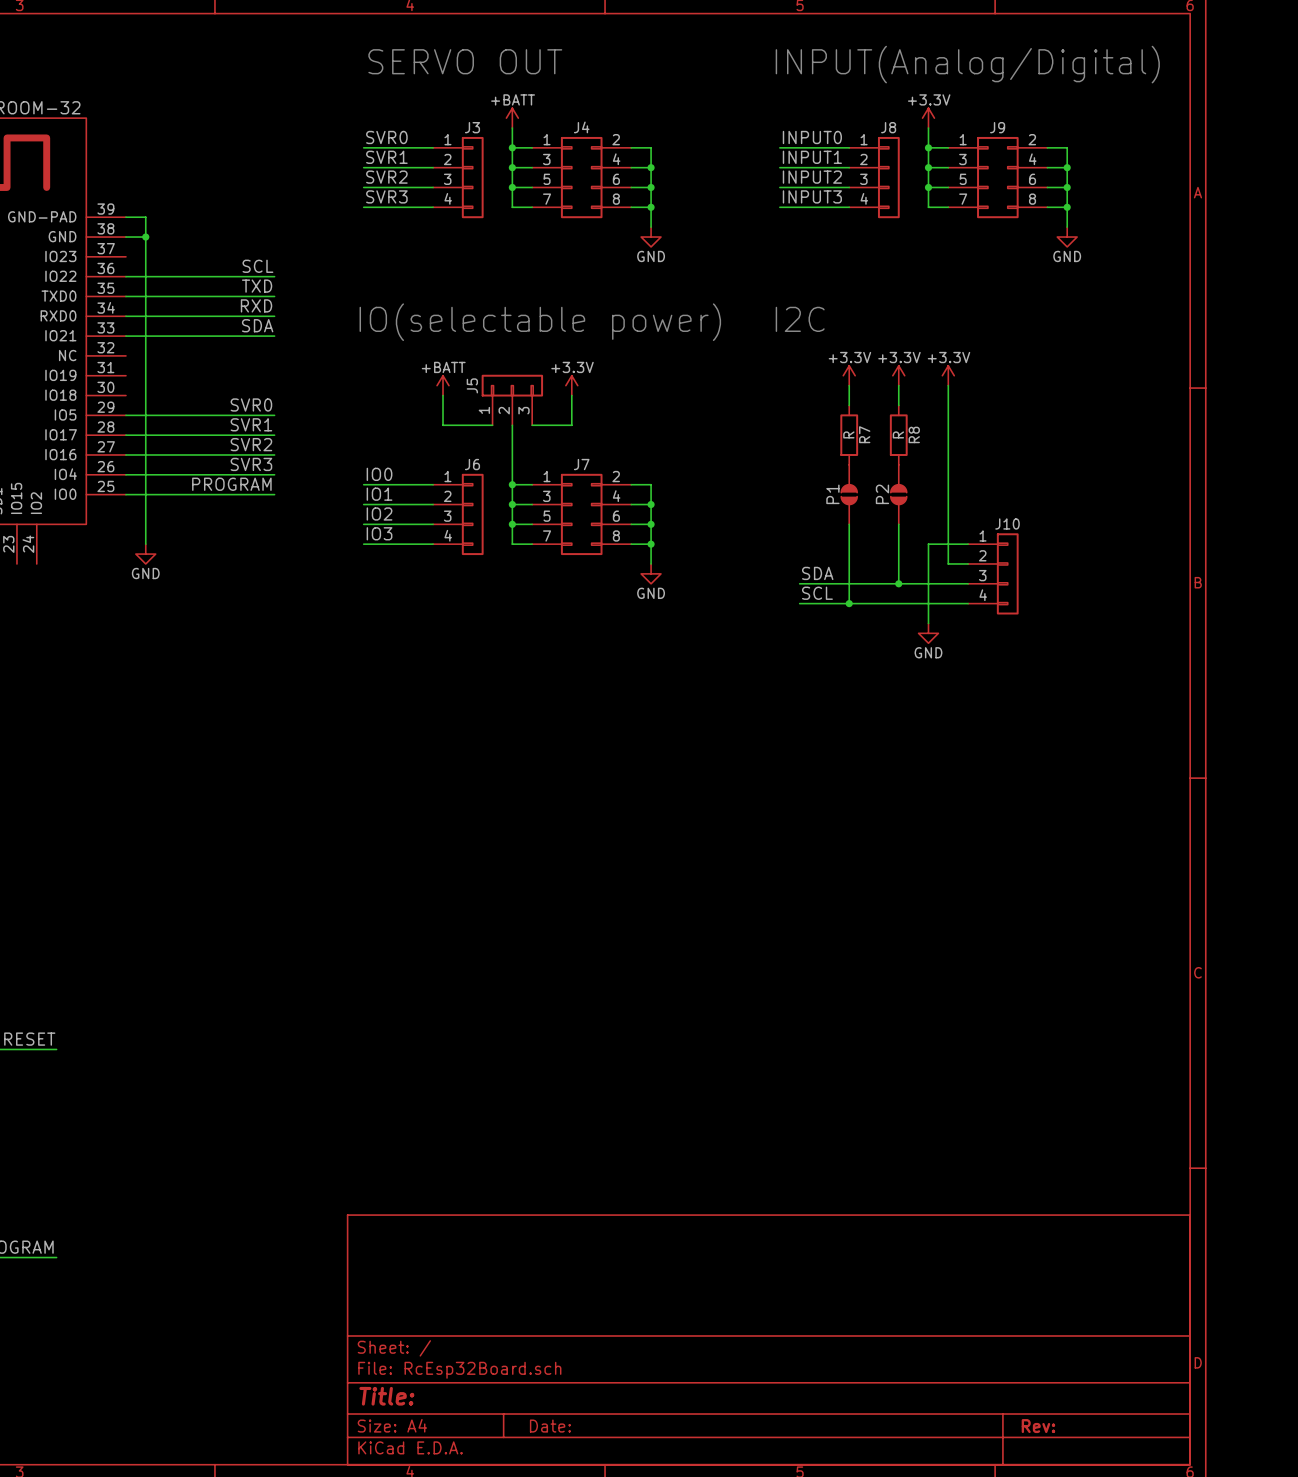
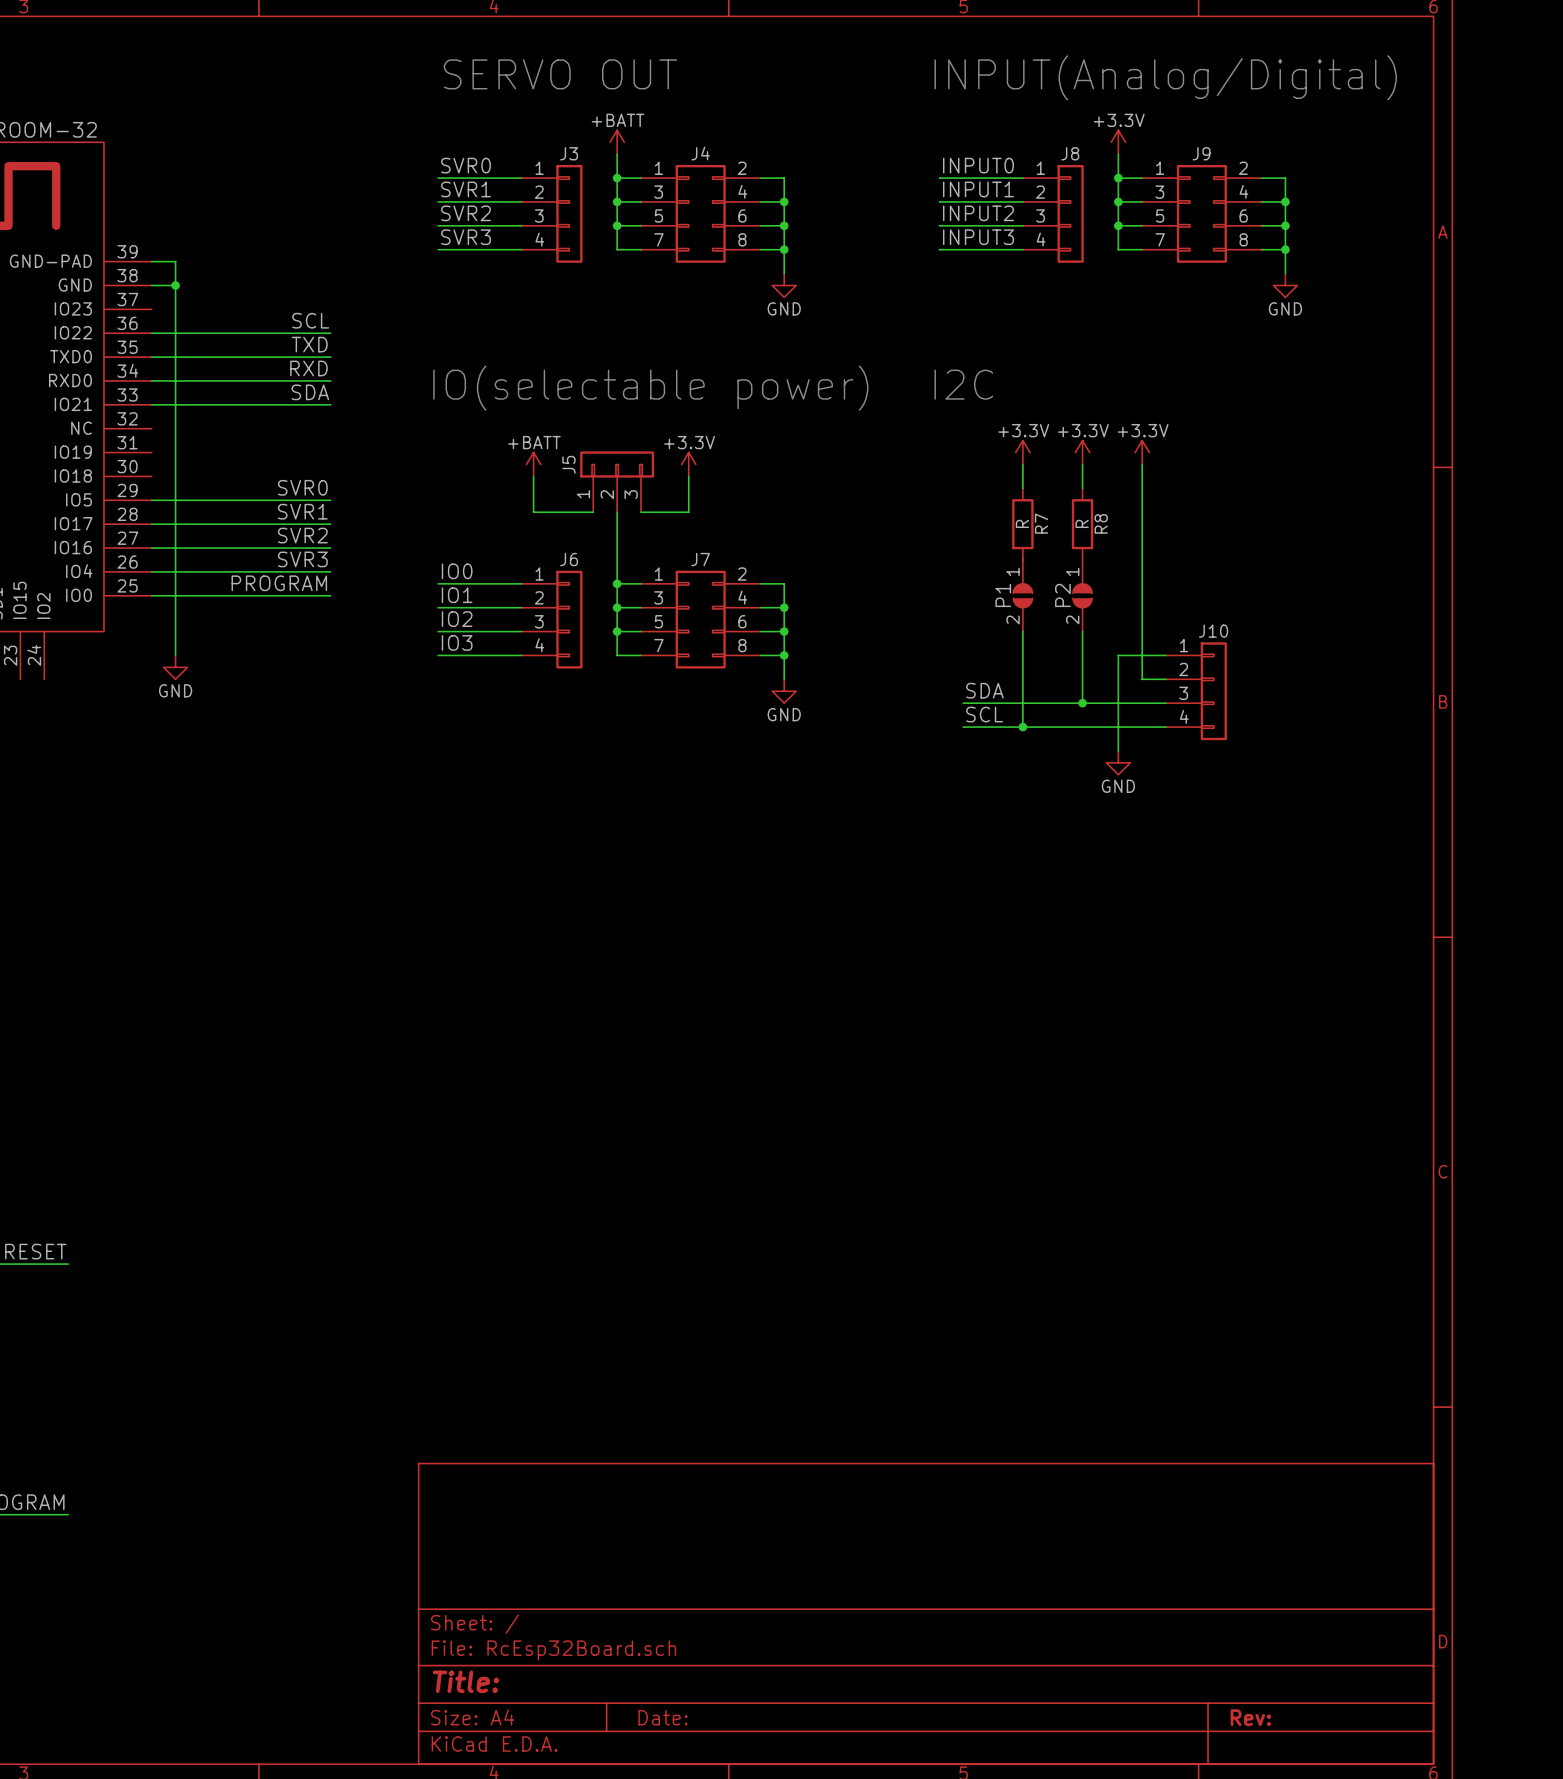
P1 pin number: none -> 1 (1013, 571)
P2 pin number: none -> 1 (1072, 571)
P1 pin number: none -> 2 (1013, 619)
P2 pin number: none -> 2 (1072, 619)

